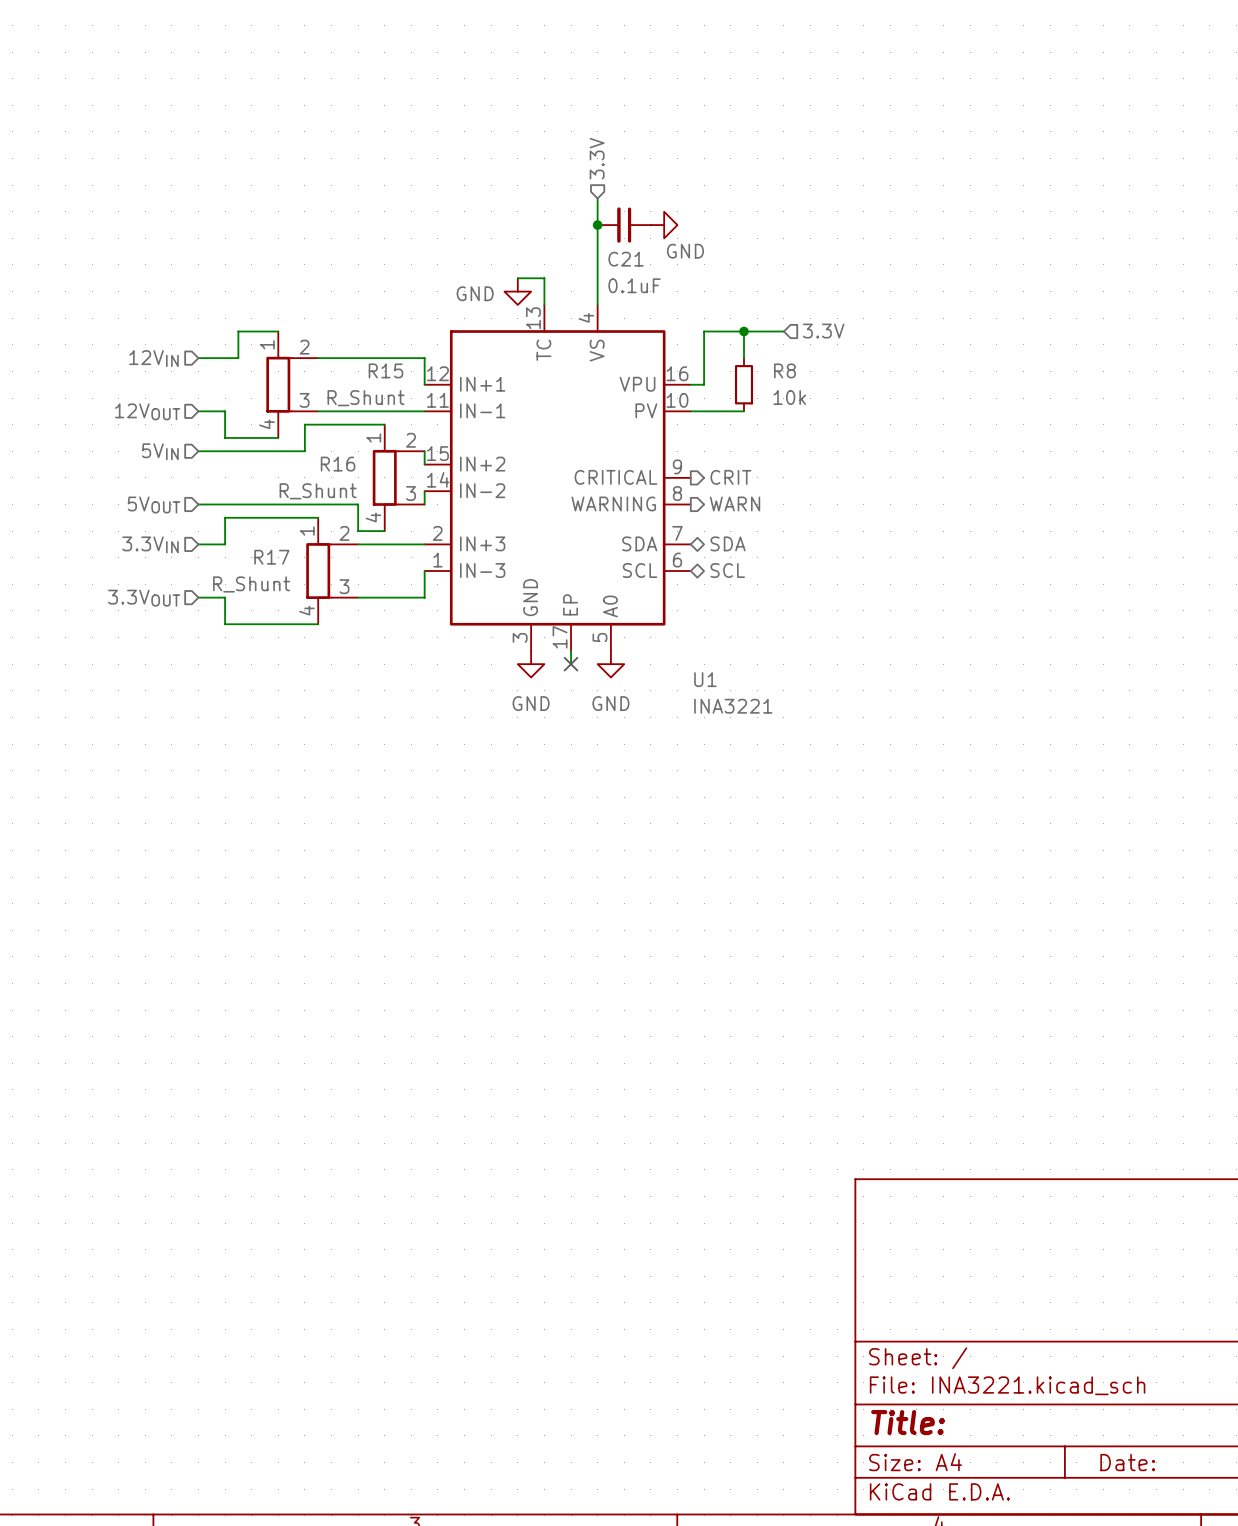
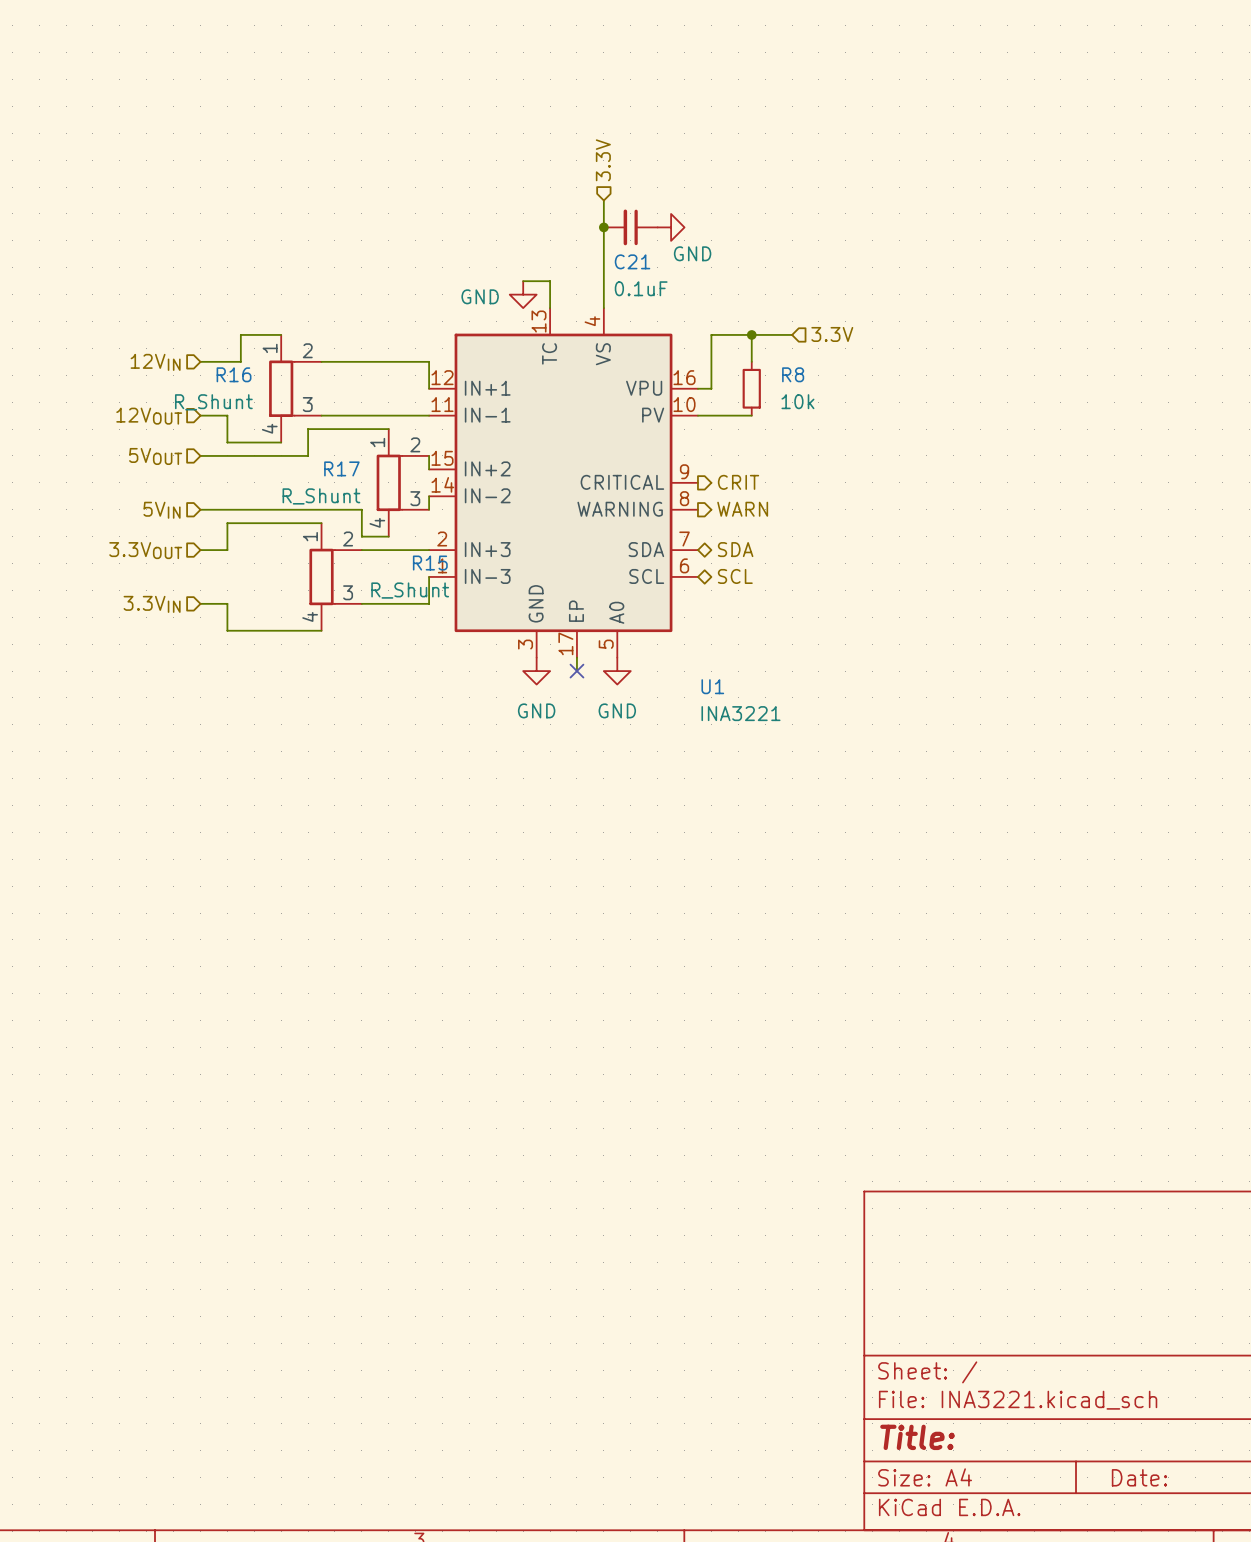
R15 name: R15 (385, 370) -> R16 (234, 374)
R15 value position: R_Shunt (366, 398) -> R_Shunt (213, 402)
hierarchical label: 5VIN (160, 451) -> 5VOUT (155, 456)
R16 name: R16 (338, 464) -> R17 (341, 468)
hierarchical label: 5VOUT (154, 504) -> 5VIN (162, 510)
hierarchical label: 3.3VIN (150, 544) -> 3.3VOUT (145, 550)
R17 name: R17 (271, 557) -> R15 (430, 563)
R17 value position: R_Shunt (251, 584) -> R_Shunt (410, 590)
hierarchical label: 3.3VOUT (144, 598) -> 3.3VIN (152, 604)

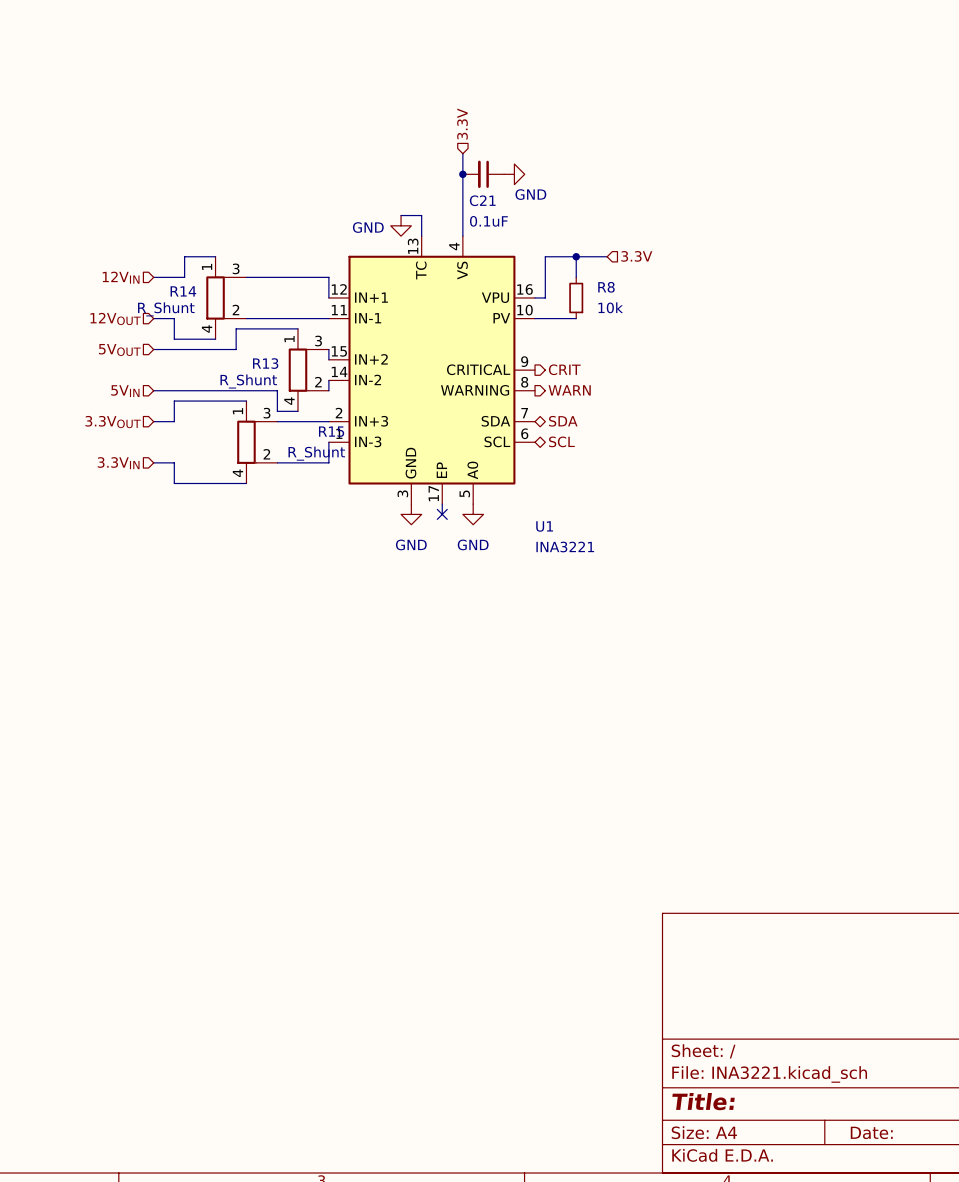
R16 pin name: 2 (307, 350) -> 3 (236, 268)
R16 name: R16 (234, 374) -> R14 (183, 291)
R16 pin name: 3 (307, 404) -> 2 (235, 310)
R17 pin name: 2 (415, 444) -> 3 (318, 341)
R17 name: R17 (341, 468) -> R13 (265, 363)
R17 pin name: 3 (415, 498) -> 2 (318, 382)
R15 pin name: 2 (348, 538) -> 3 (267, 413)
R15 pin name: 3 (348, 592) -> 2 (266, 454)

